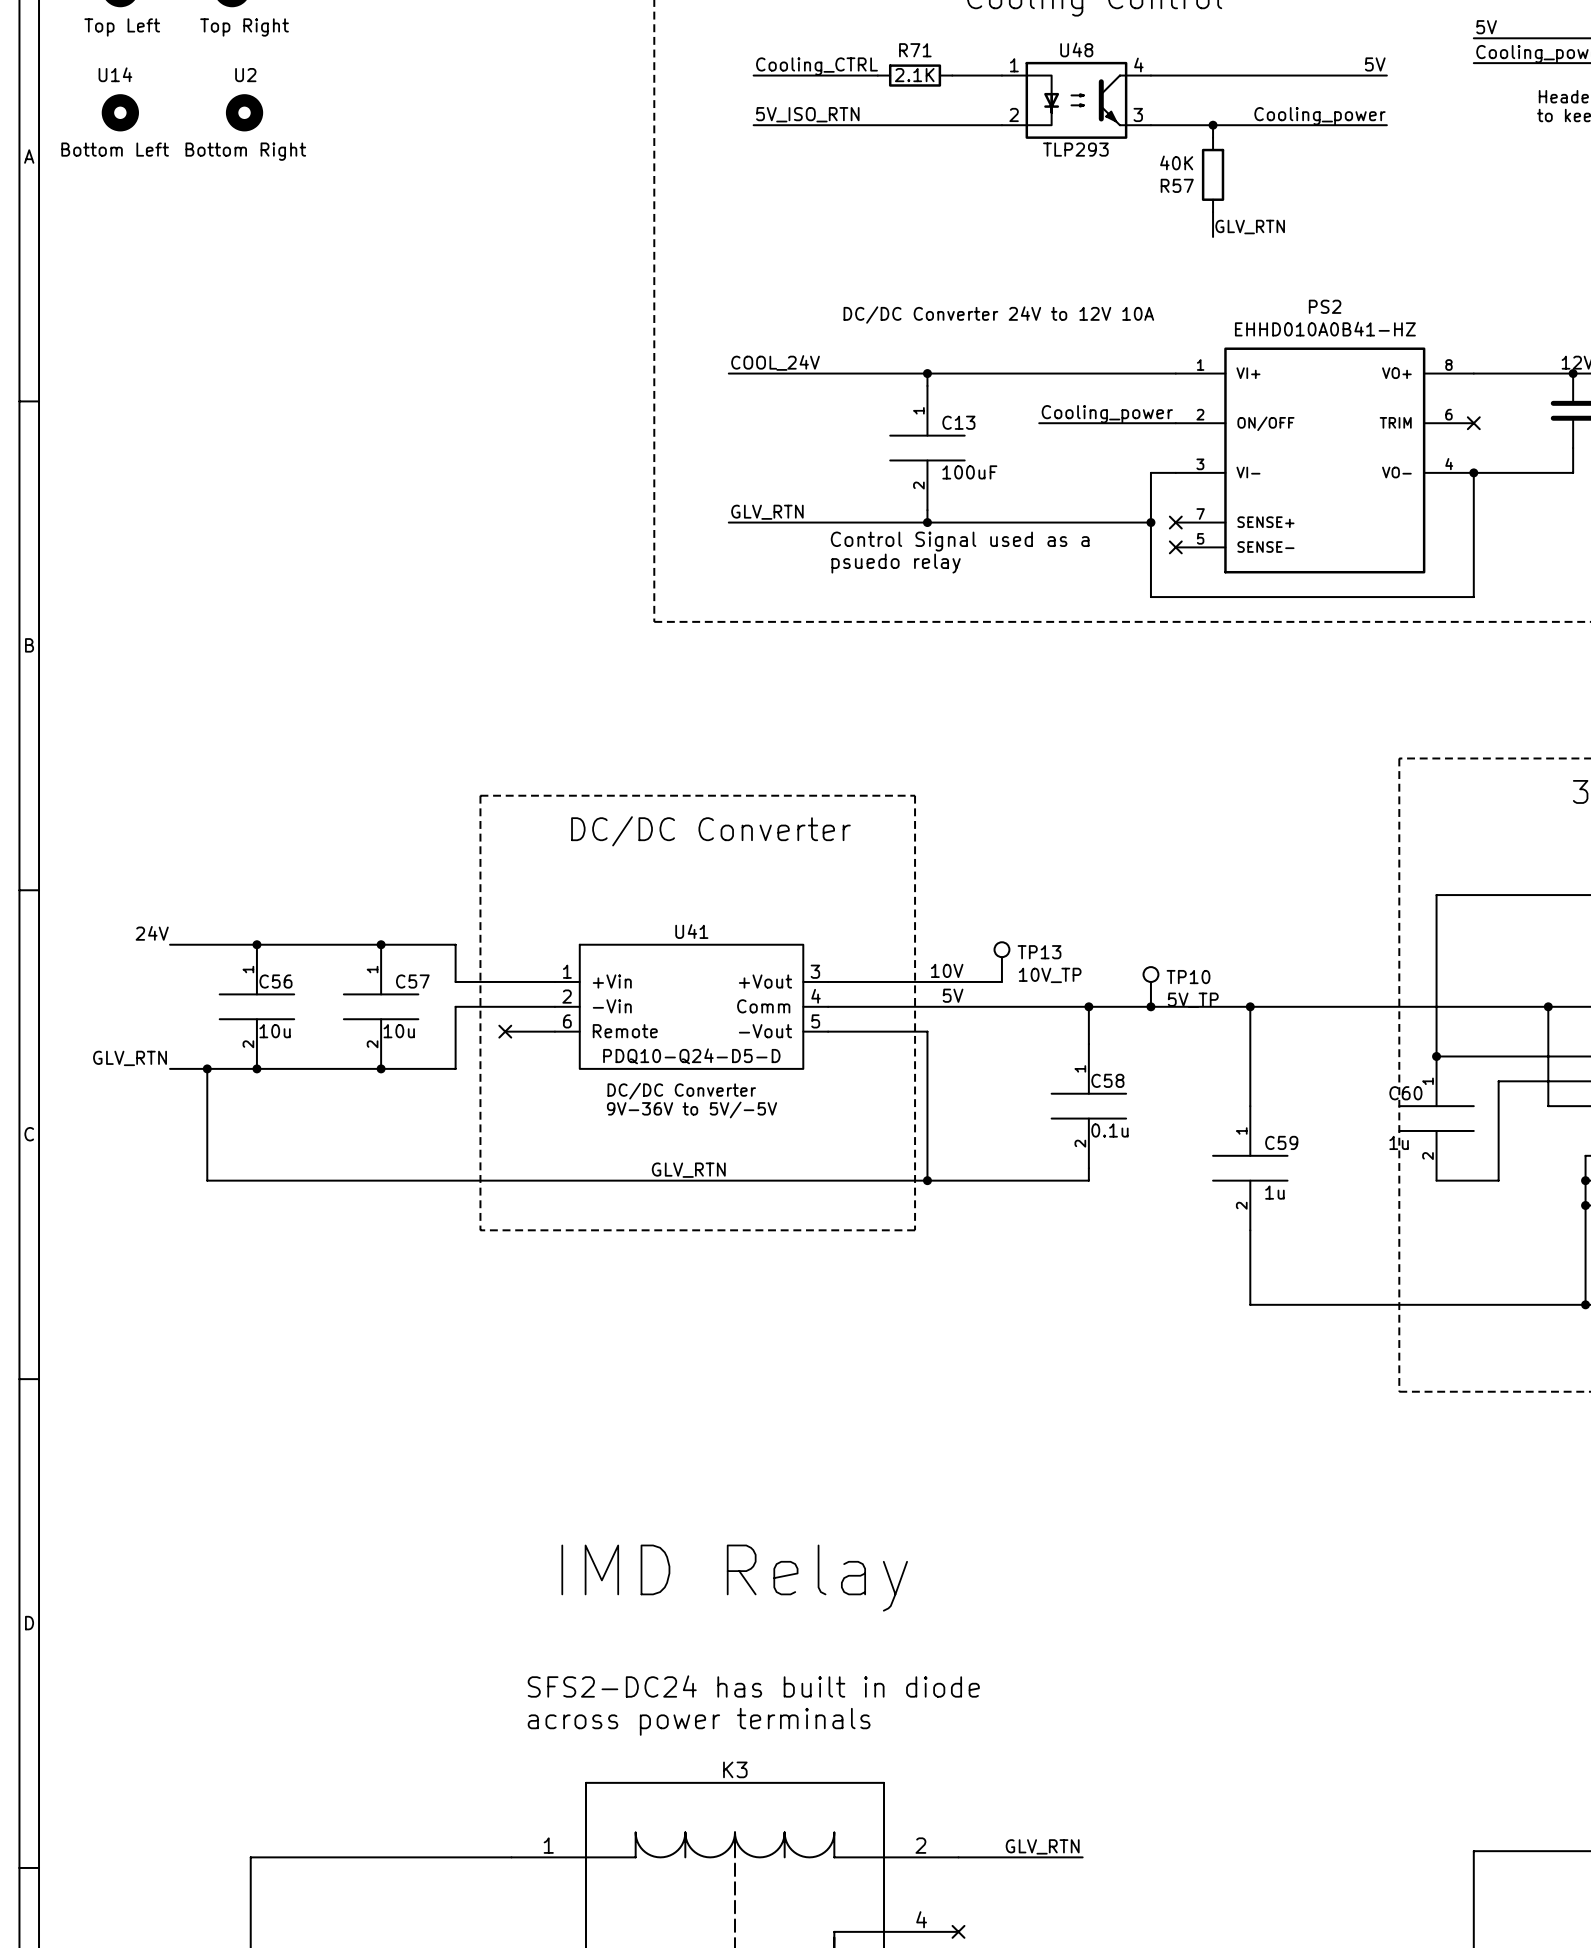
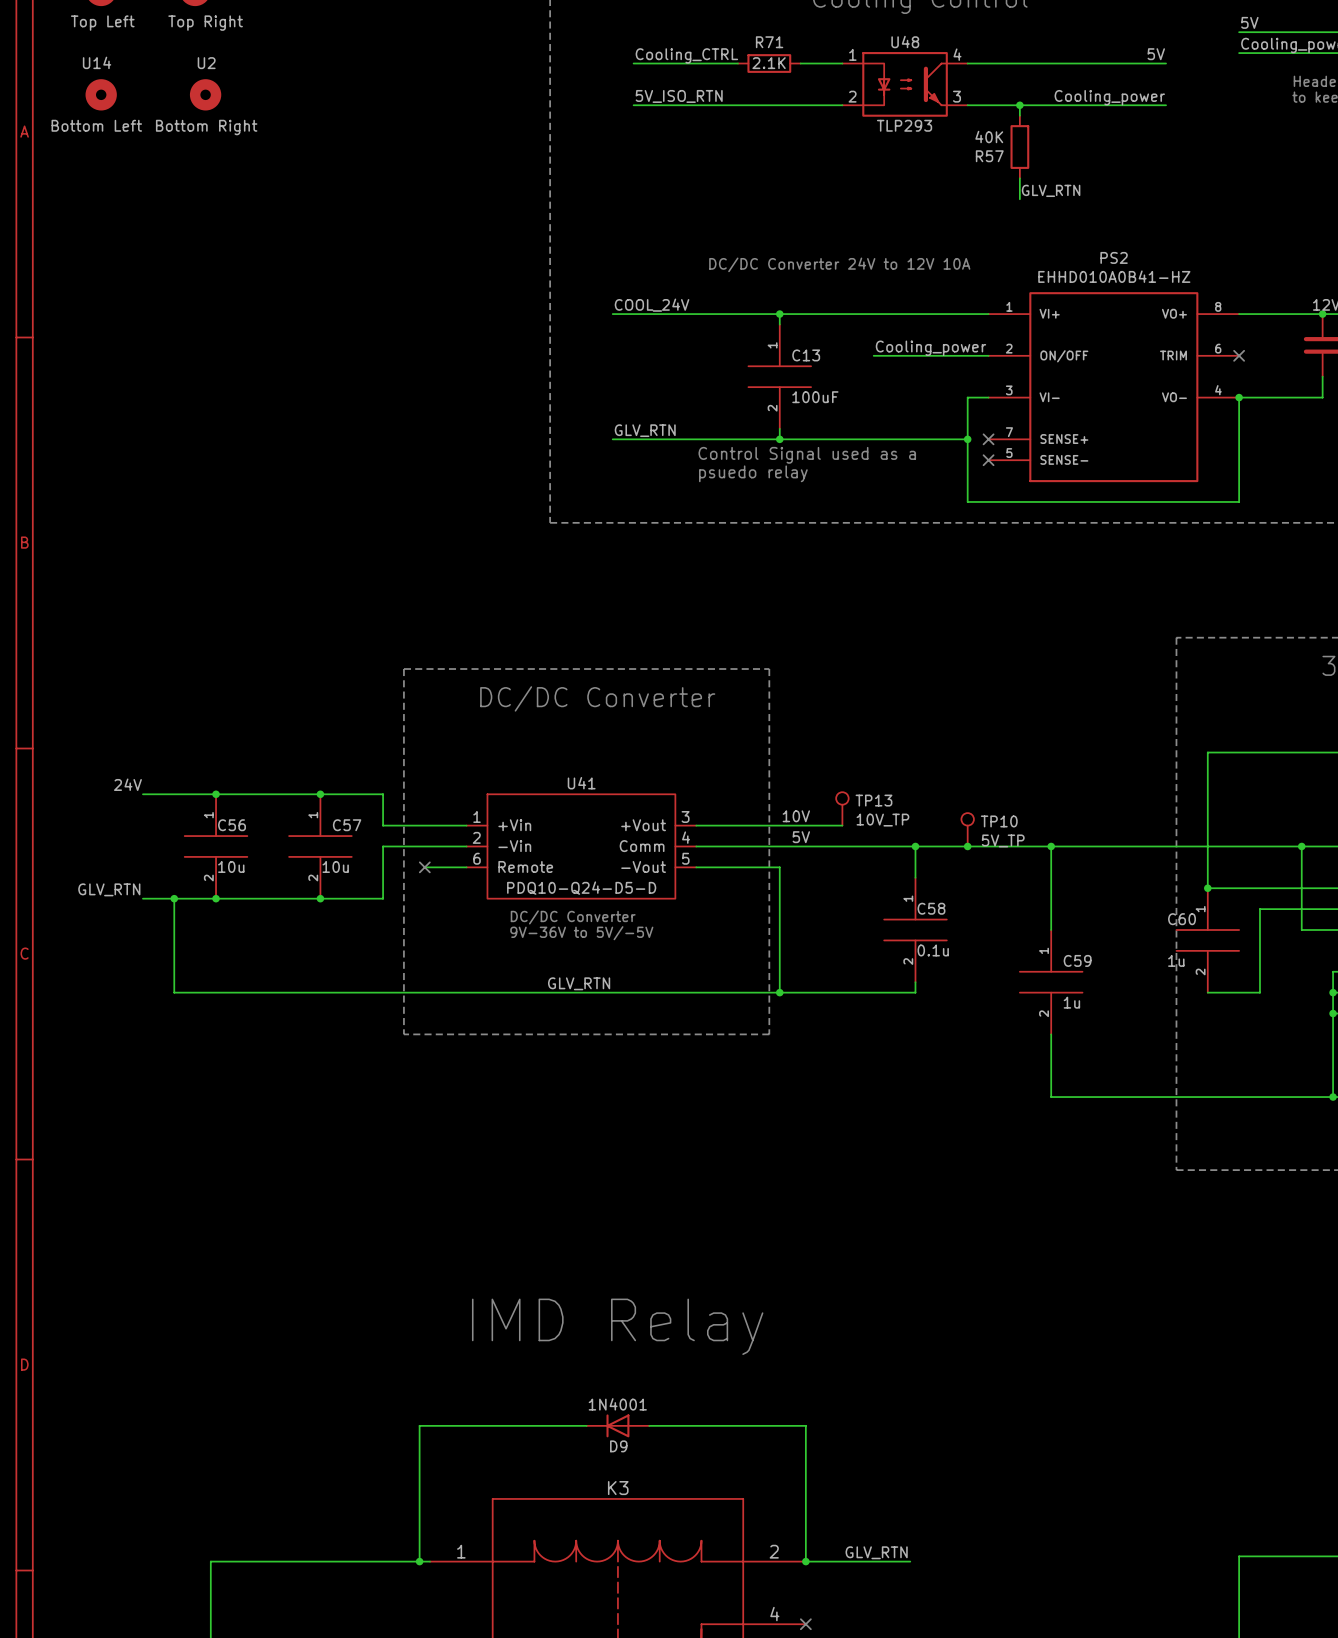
text: SFS2-DC24 has built in diode (753, 1686) -> none
wire: none -> (586, 1425) (419, 1425) (419, 1561)
D9: none -> 1N4001 (617, 1425)
wire: none -> (649, 1425) (805, 1425) (805, 1561)
text: across power terminals (699, 1721) -> none
junction: none -> (419, 1561)
junction: none -> (805, 1561)

